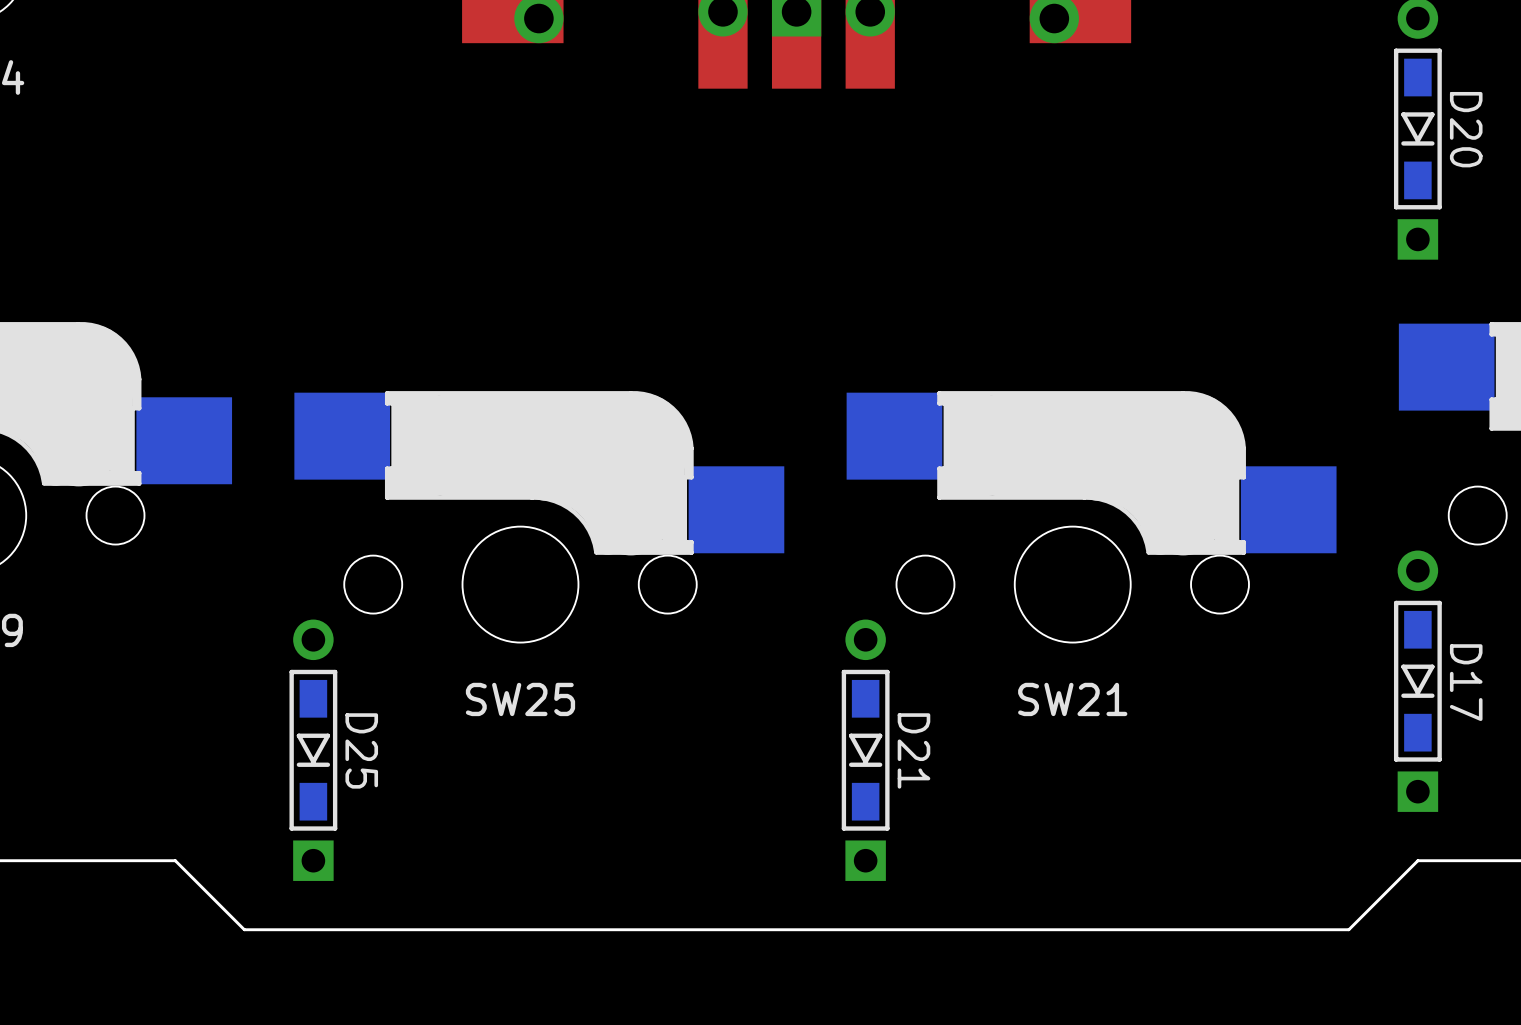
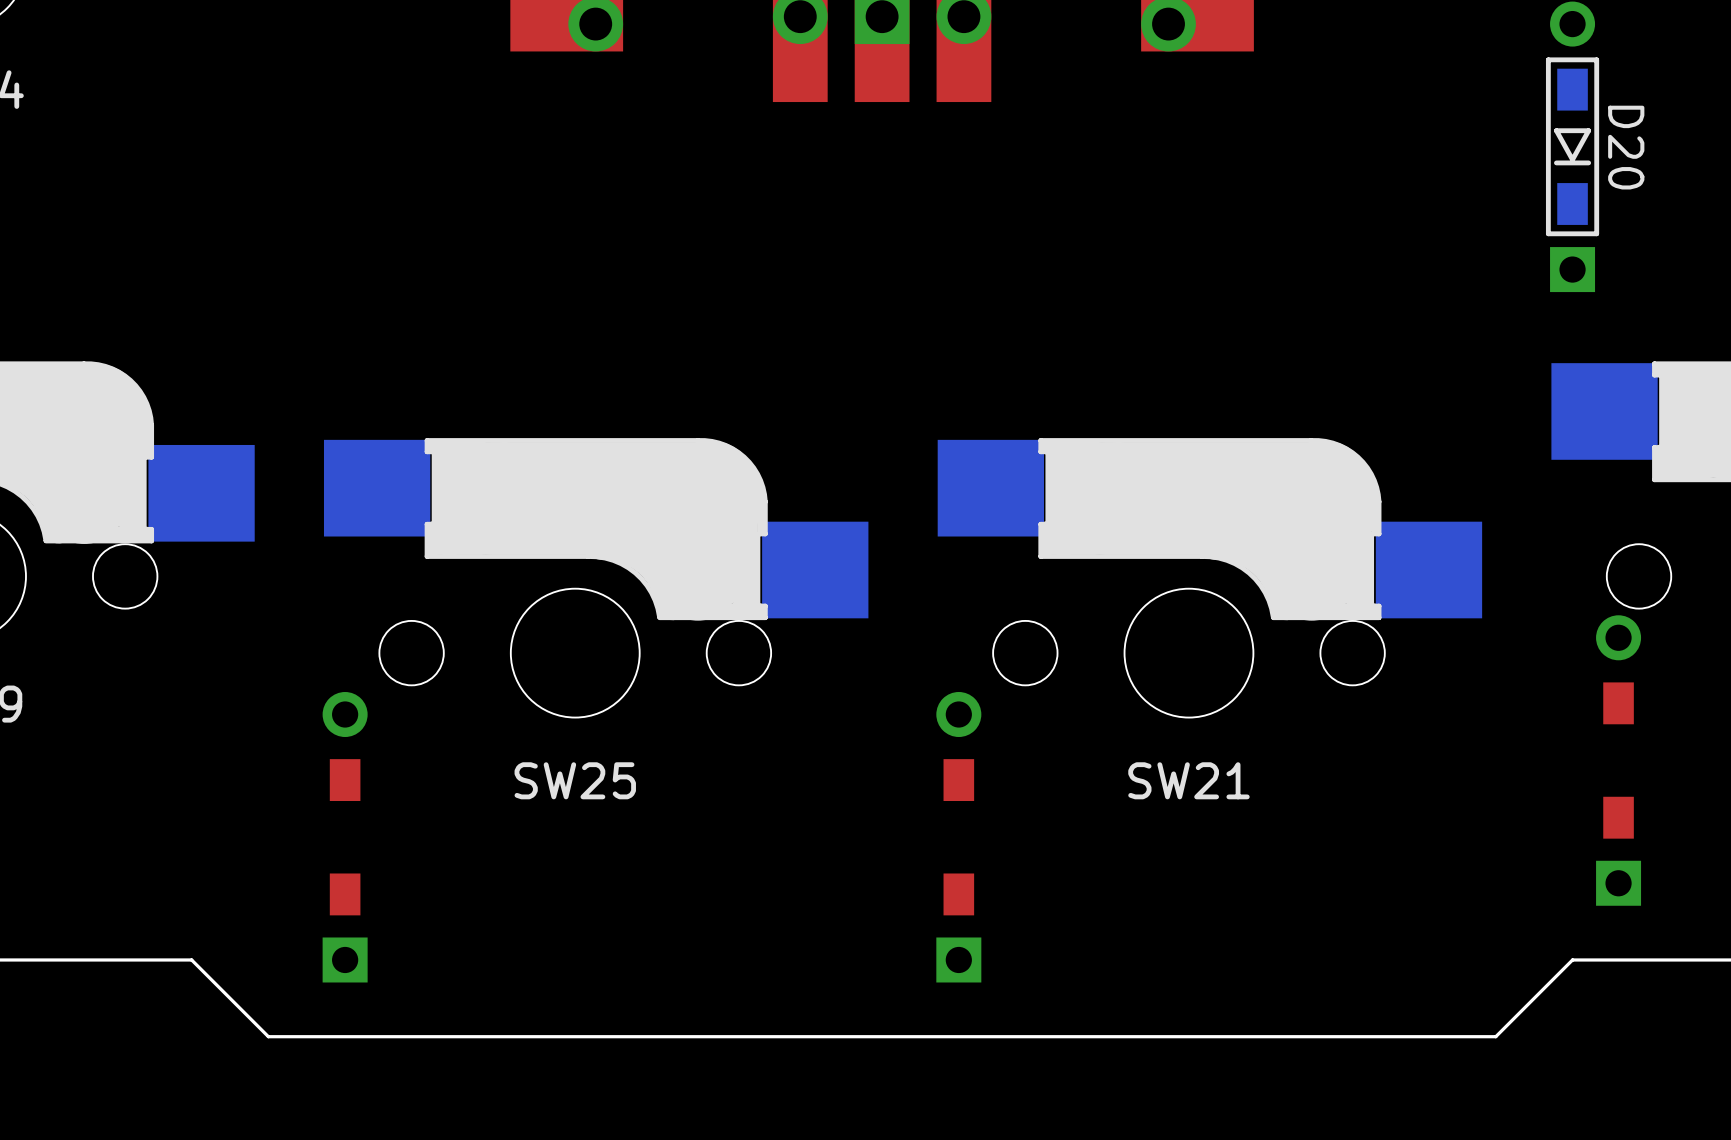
D17 side: top (1417, 681) -> bottom (1618, 760)
D25 side: top (313, 750) -> bottom (345, 837)
D21 side: top (865, 750) -> bottom (958, 837)

